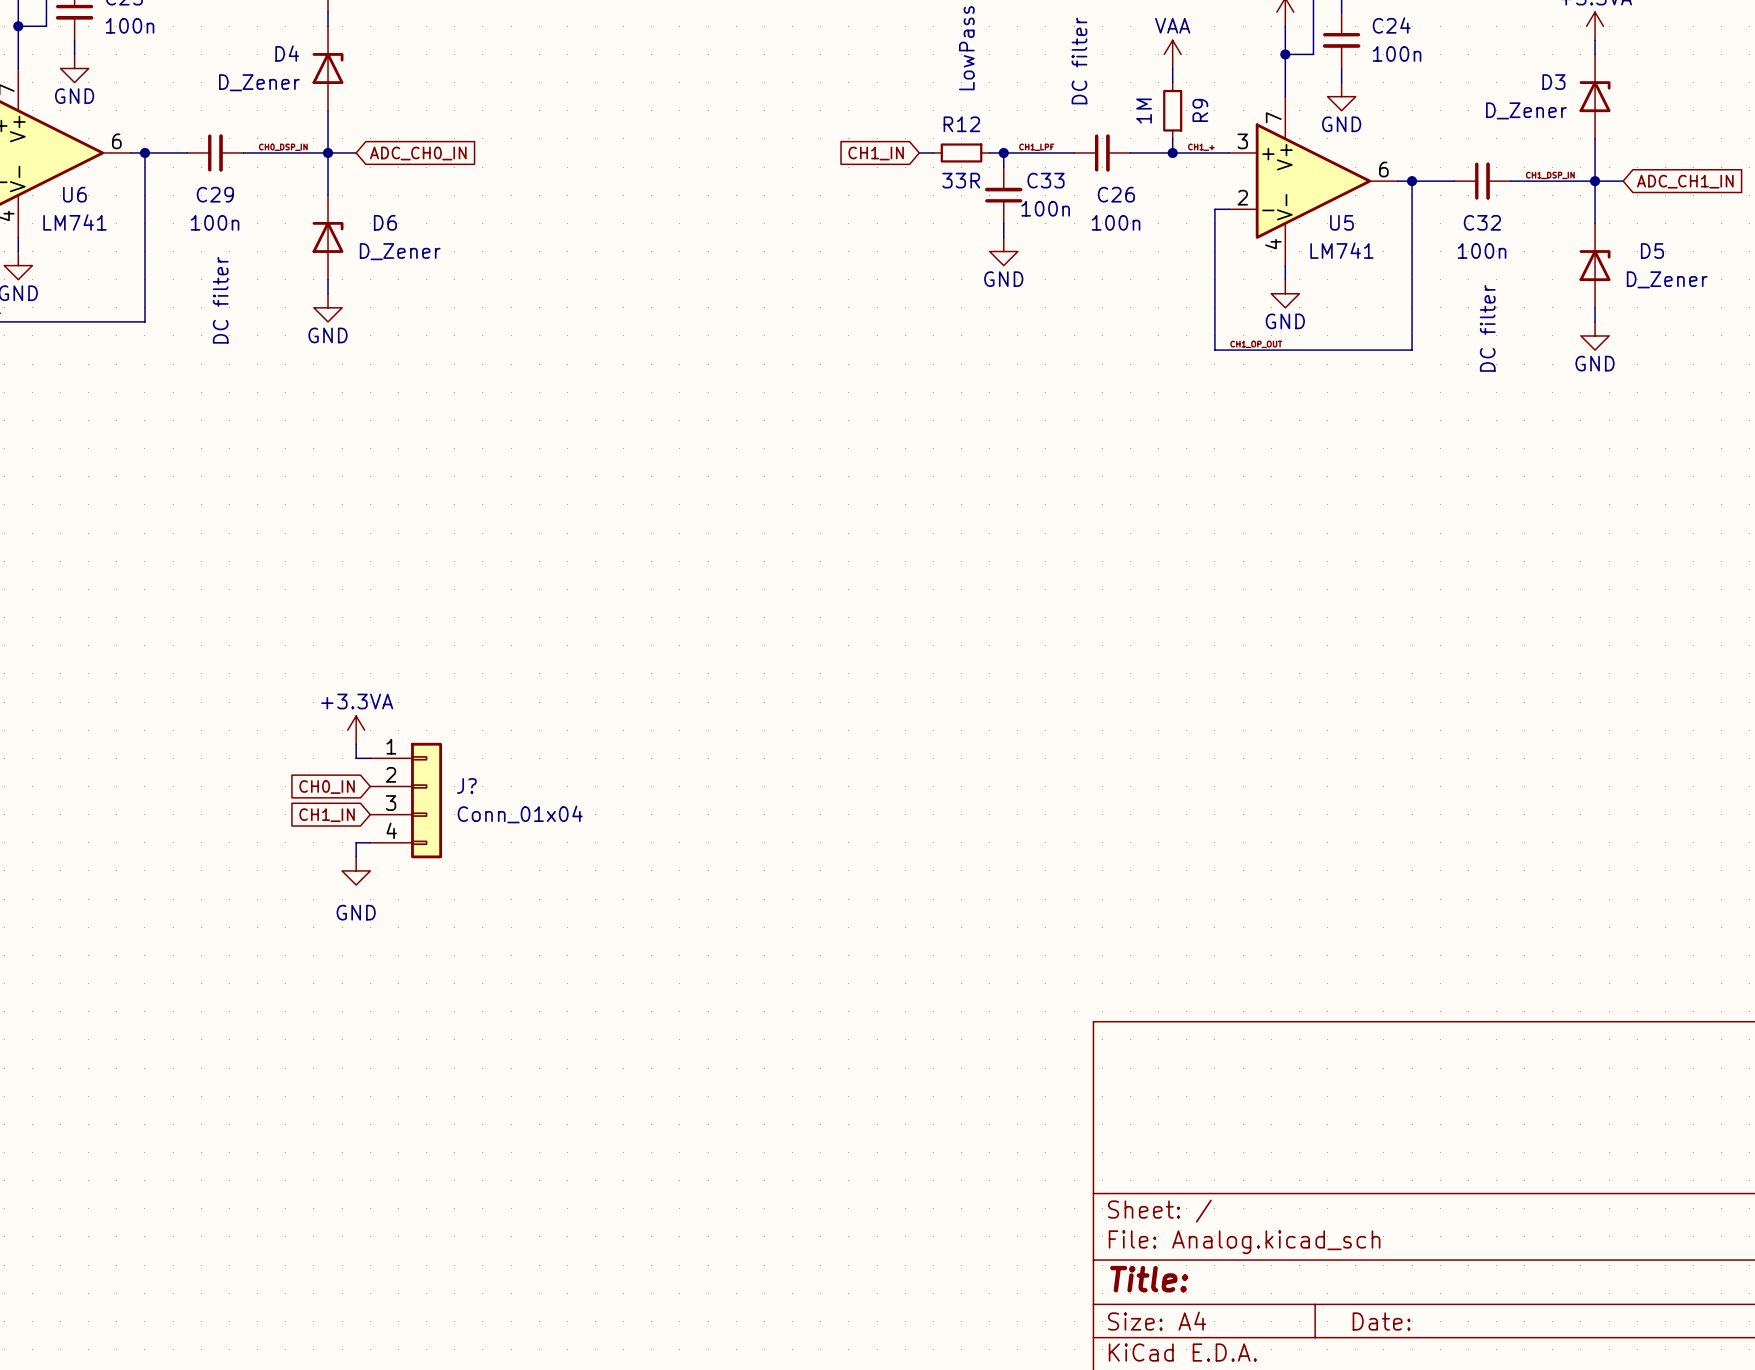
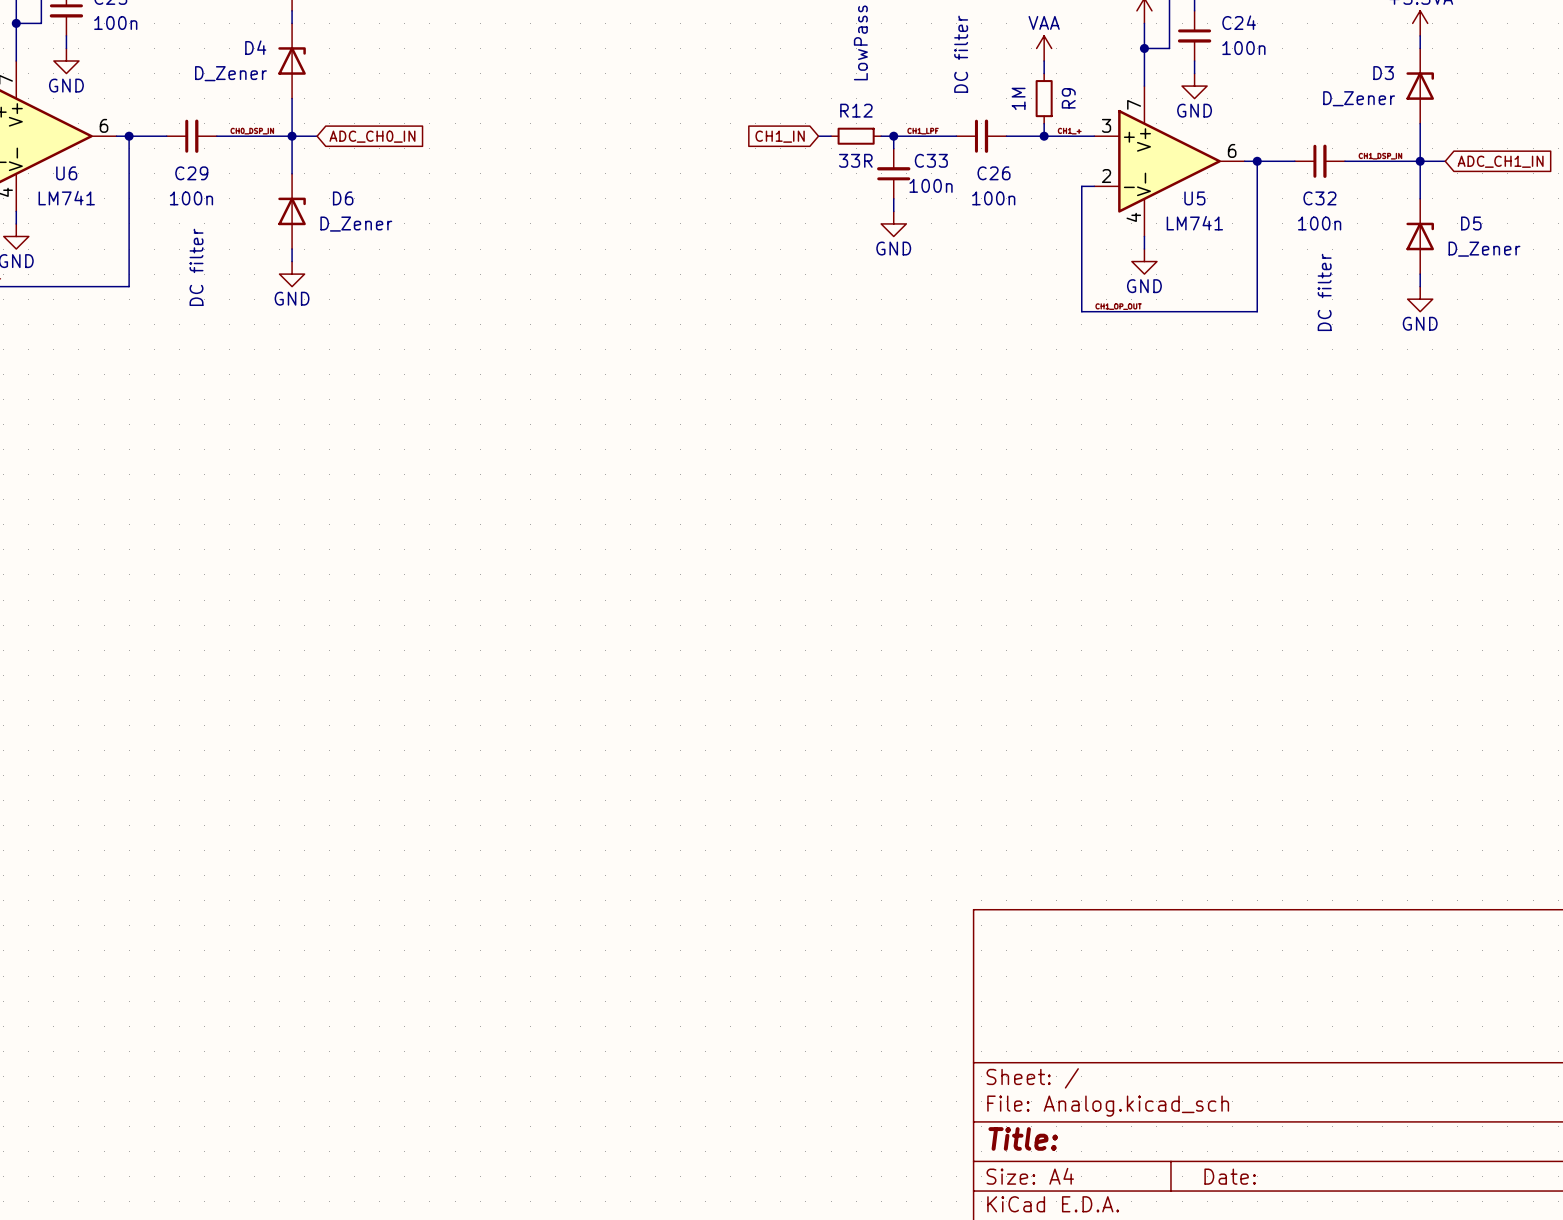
power symbol: +3.3VA (356, 730) -> none
wire: (356, 744) (356, 758) (370, 758) -> none
global label: CH0_IN (327, 787) -> none
J?: Conn_01x04 (406, 800) -> none
global label: CH1_IN (327, 815) -> none
wire: (370, 842) (356, 842) (356, 856) -> none
power symbol: GND (356, 870) -> none

